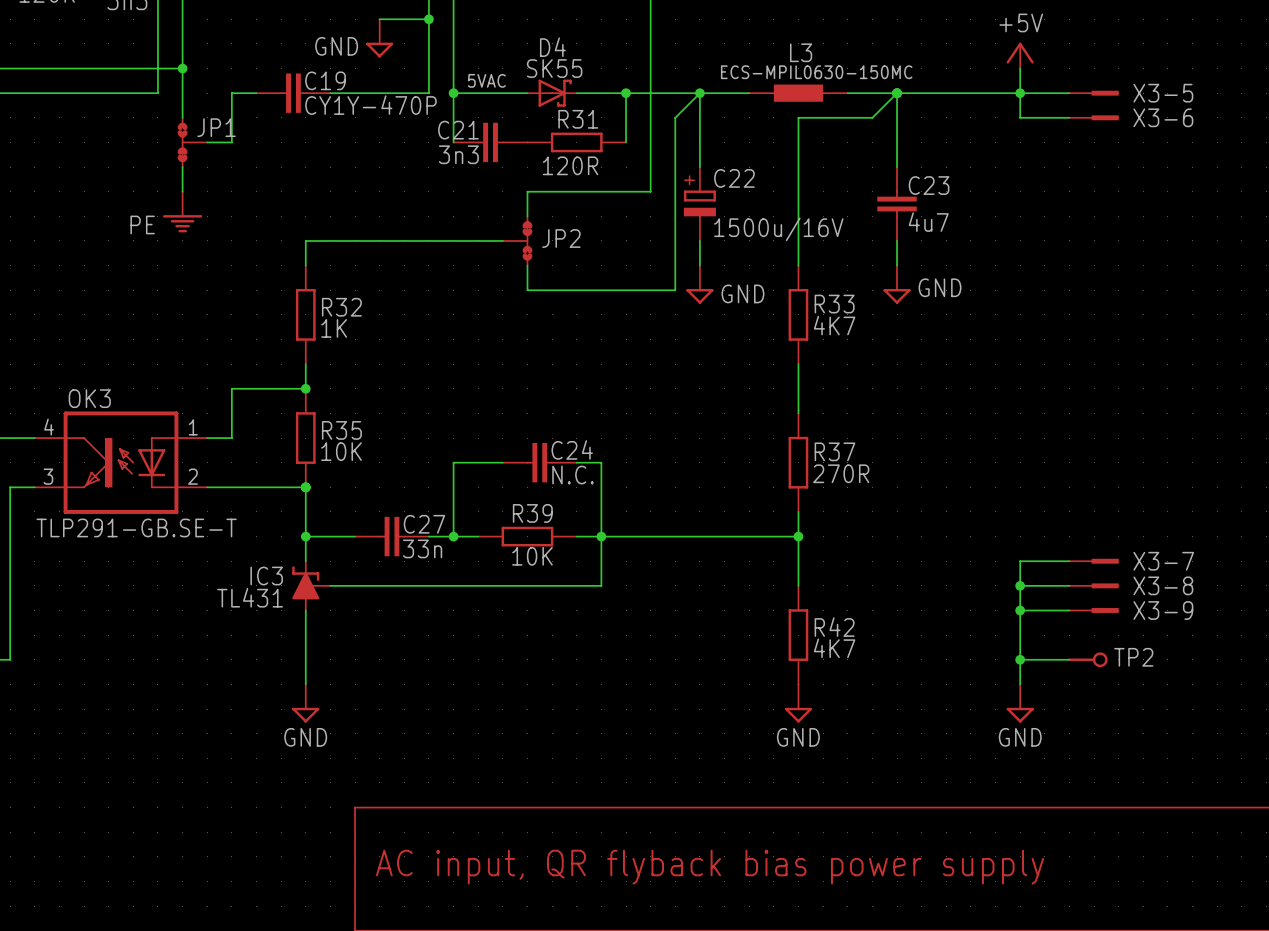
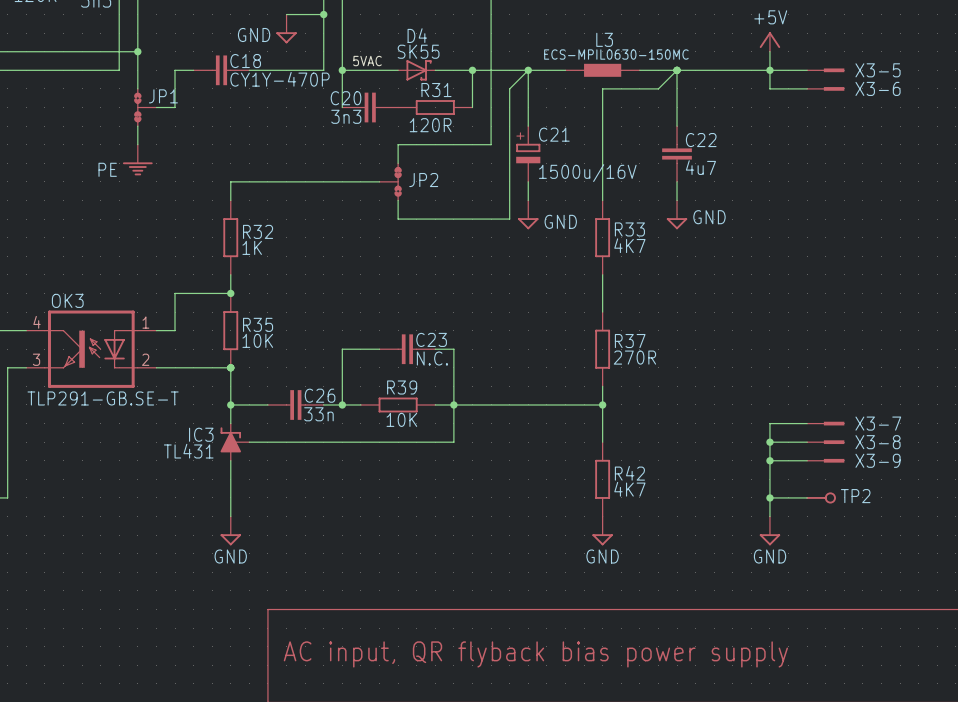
C19 name: C19 (325, 80) -> C18 (245, 61)
C21 name: C21 (458, 130) -> C20 (346, 98)
C22 name: C22 (734, 178) -> C21 (554, 134)
C23 name: C23 (929, 185) -> C22 (701, 140)
C24 name: C24 (572, 449) -> C23 (431, 339)
C27 name: C27 (424, 524) -> C26 (320, 395)

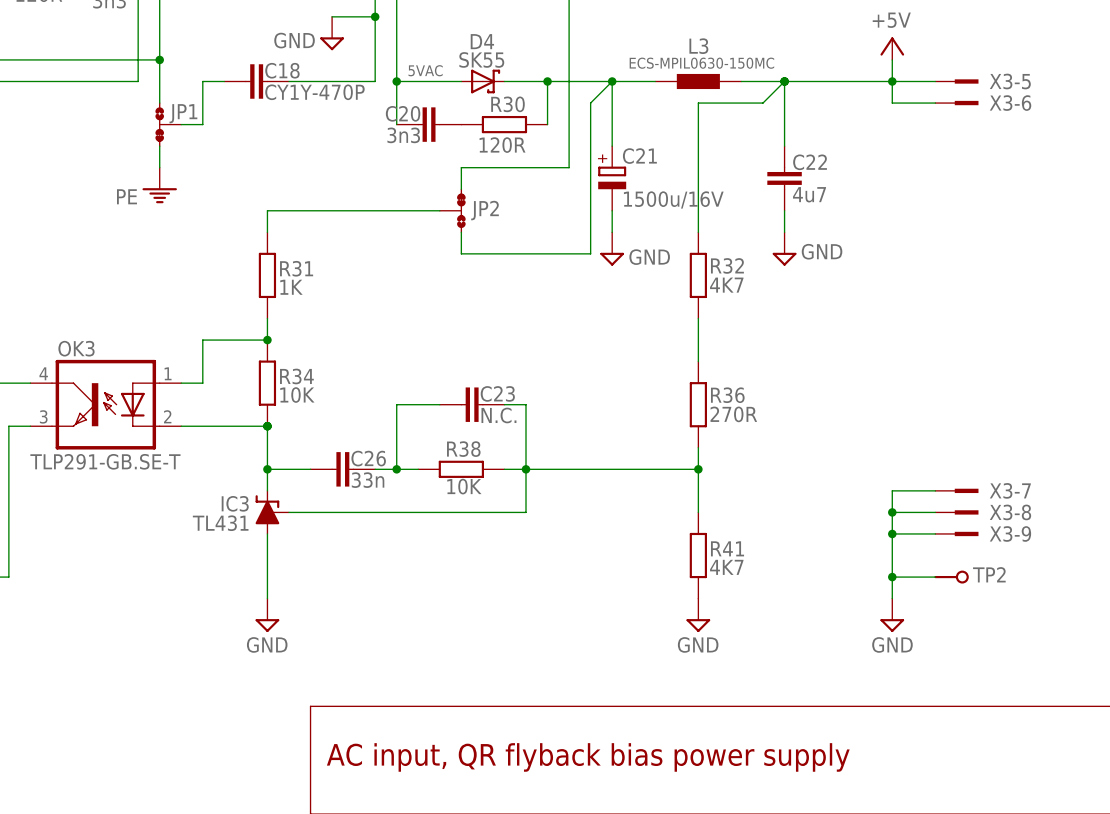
R31 name: R31 (436, 90) -> R30 (507, 104)
R33 name: R33 (629, 229) -> R32 (727, 265)
R32 name: R32 (258, 231) -> R31 (296, 268)
R35 name: R35 (258, 324) -> R34 (296, 376)
R37 name: R37 (630, 341) -> R36 (727, 395)
R39 name: R39 (402, 387) -> R38 (463, 449)
R42 name: R42 (629, 473) -> R41 (727, 548)

